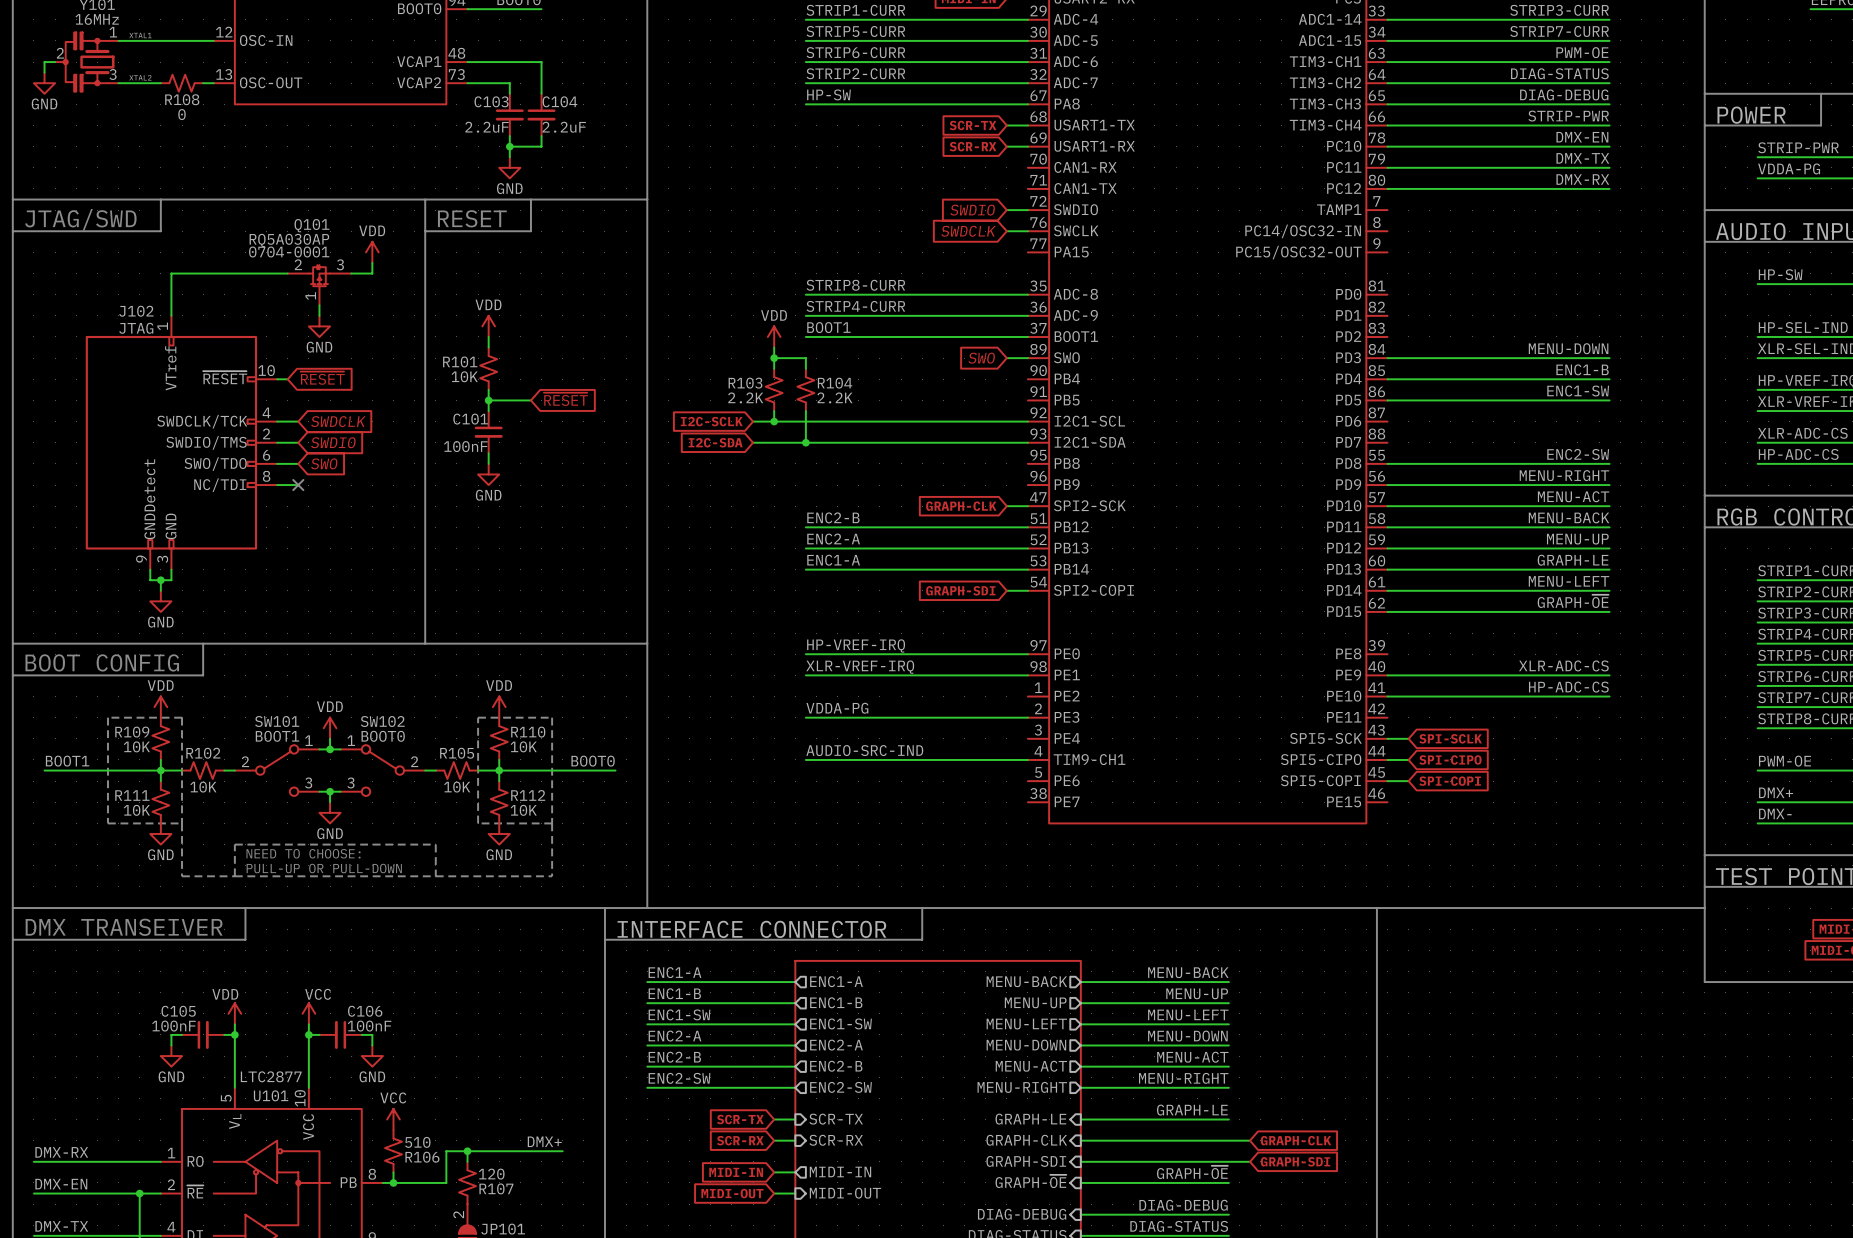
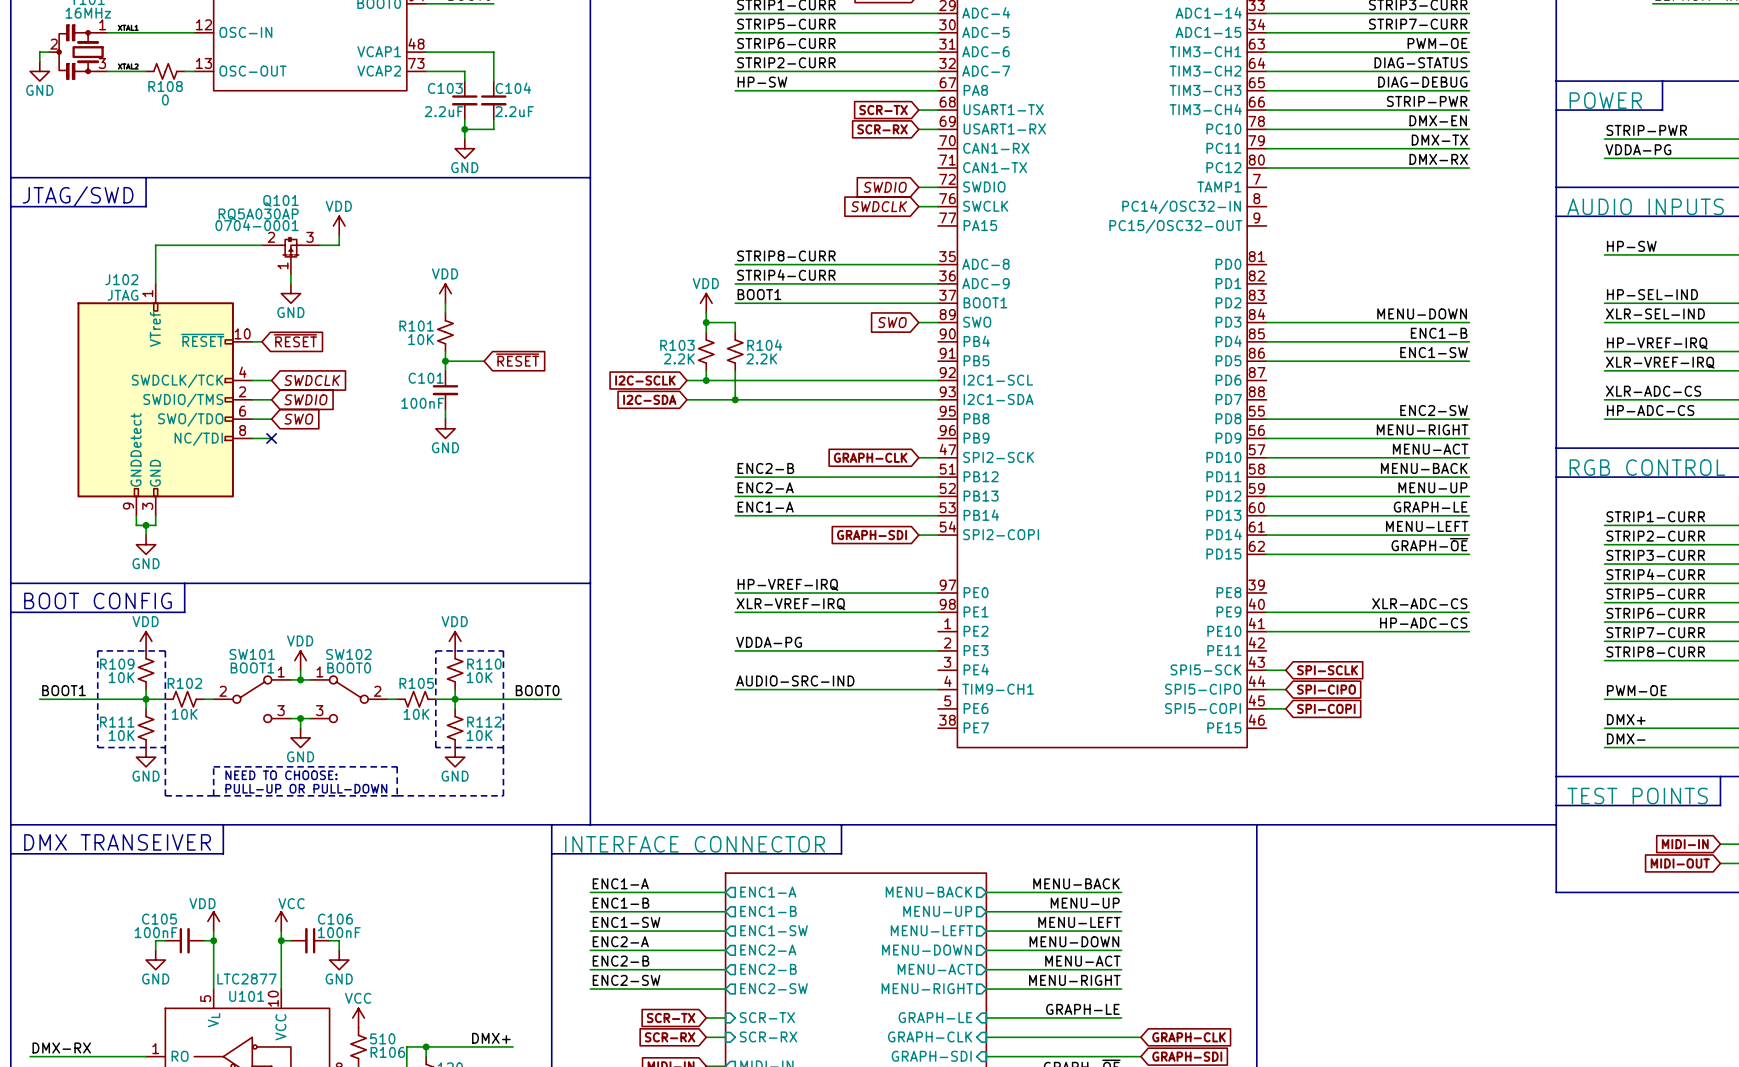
line: (425, 199) (425, 643) -> none
line: (530, 199) (530, 231) (425, 231) -> none
text: RESET (472, 218) -> none

